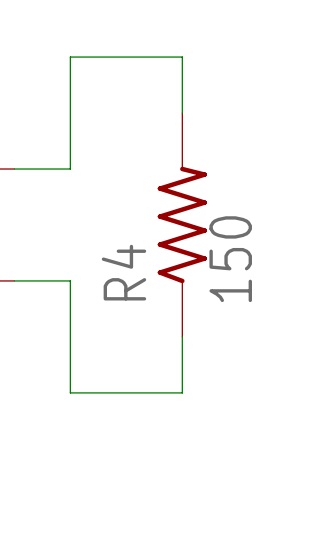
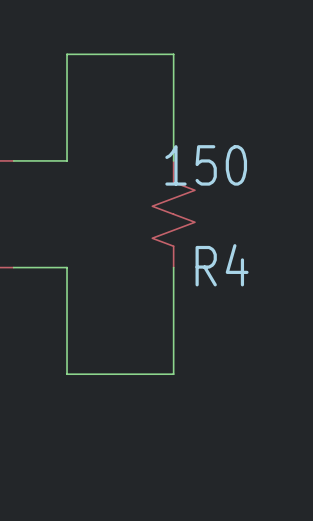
R4 symbol: [157, 113, 207, 337] -> [152, 160, 195, 268]
R4 value position: 150 (230, 259) -> 150 (206, 165)
R4 name position: R4 (123, 272) -> R4 (222, 265)

